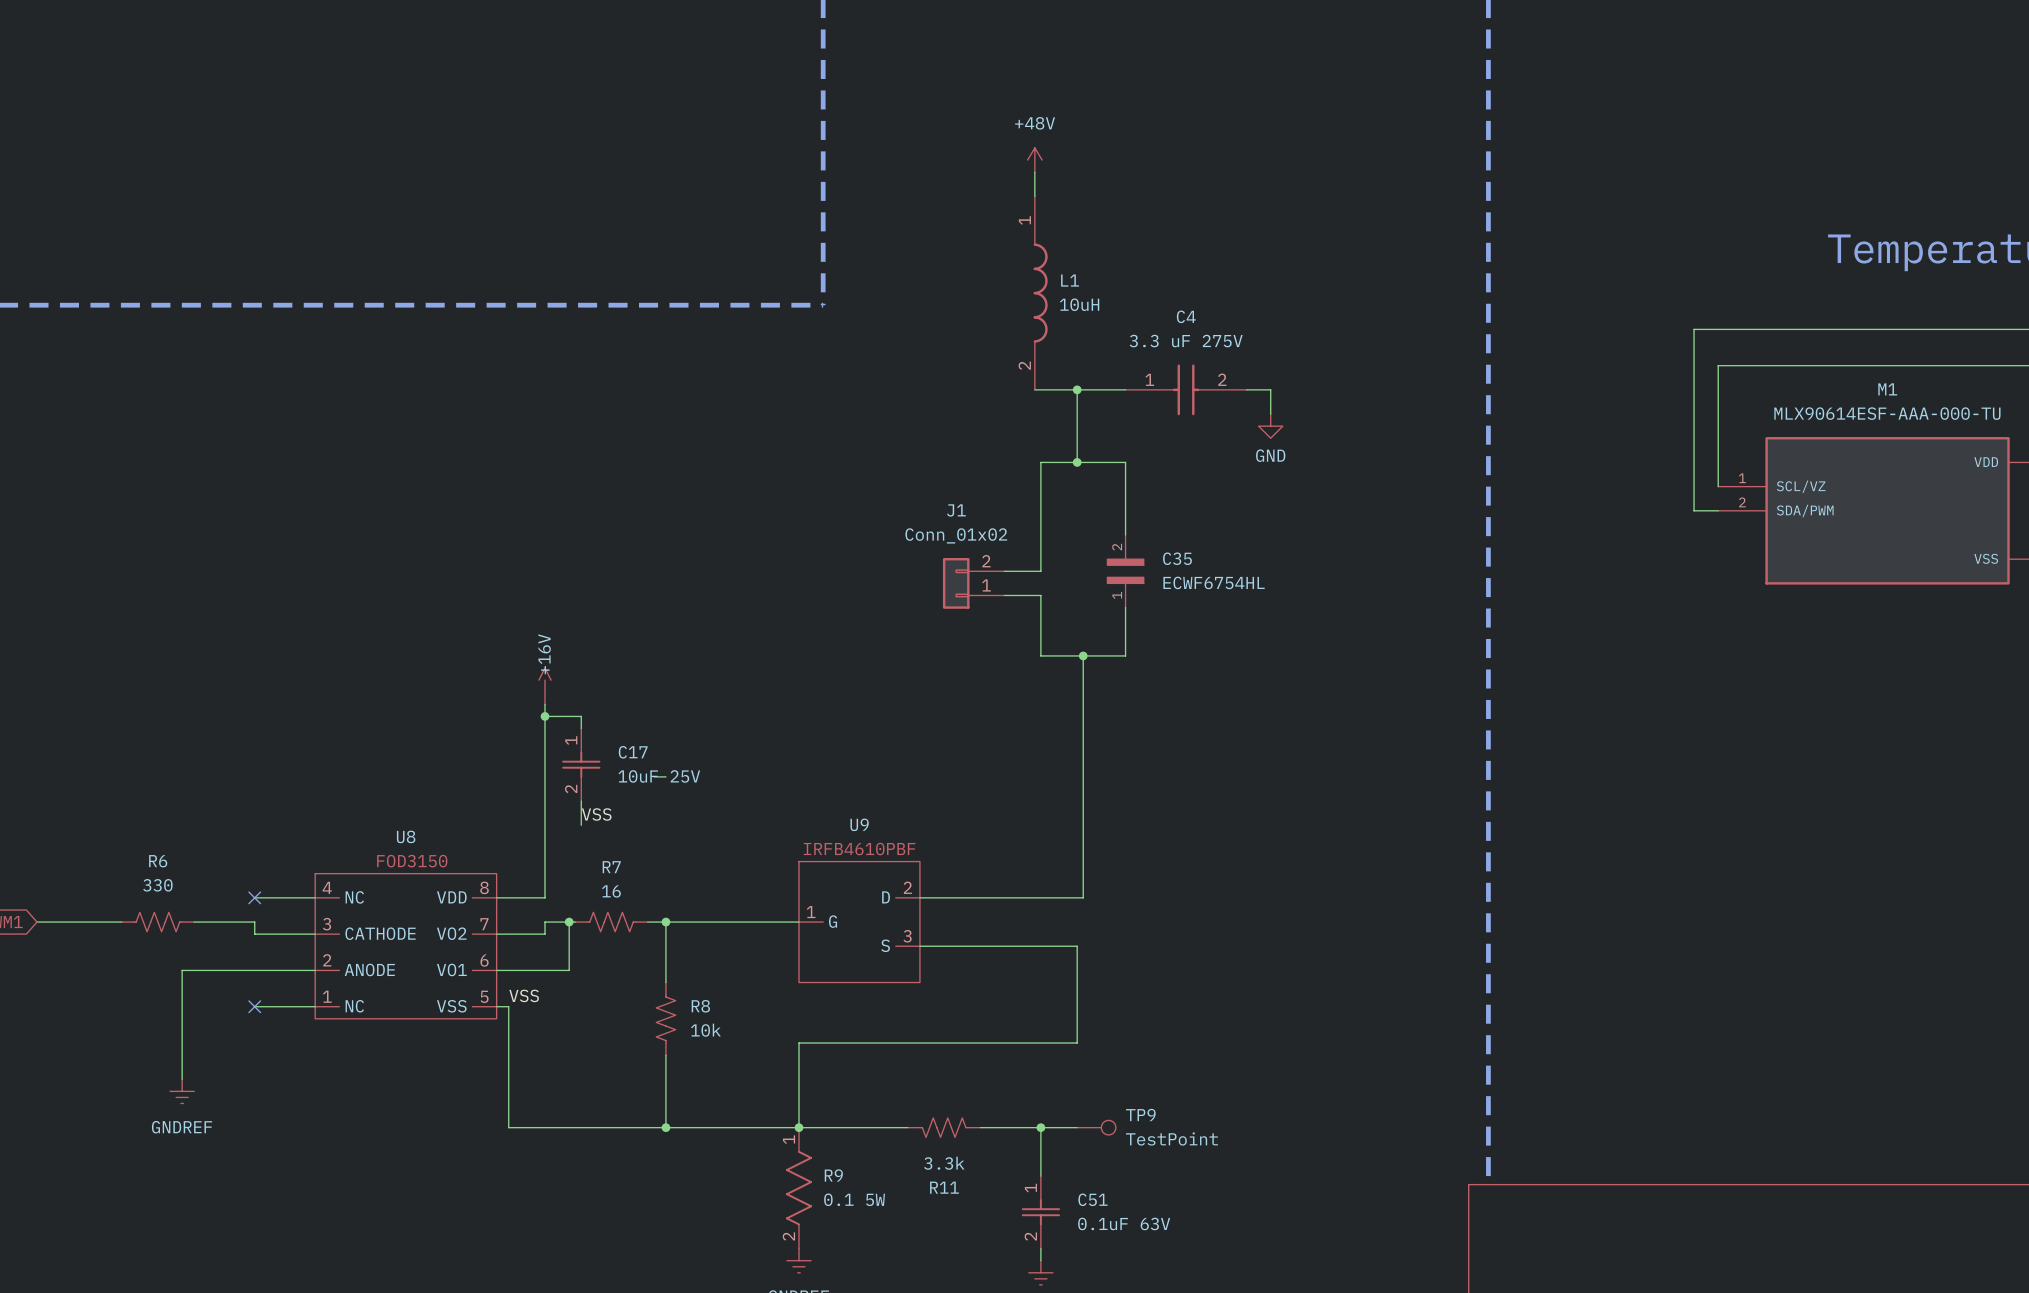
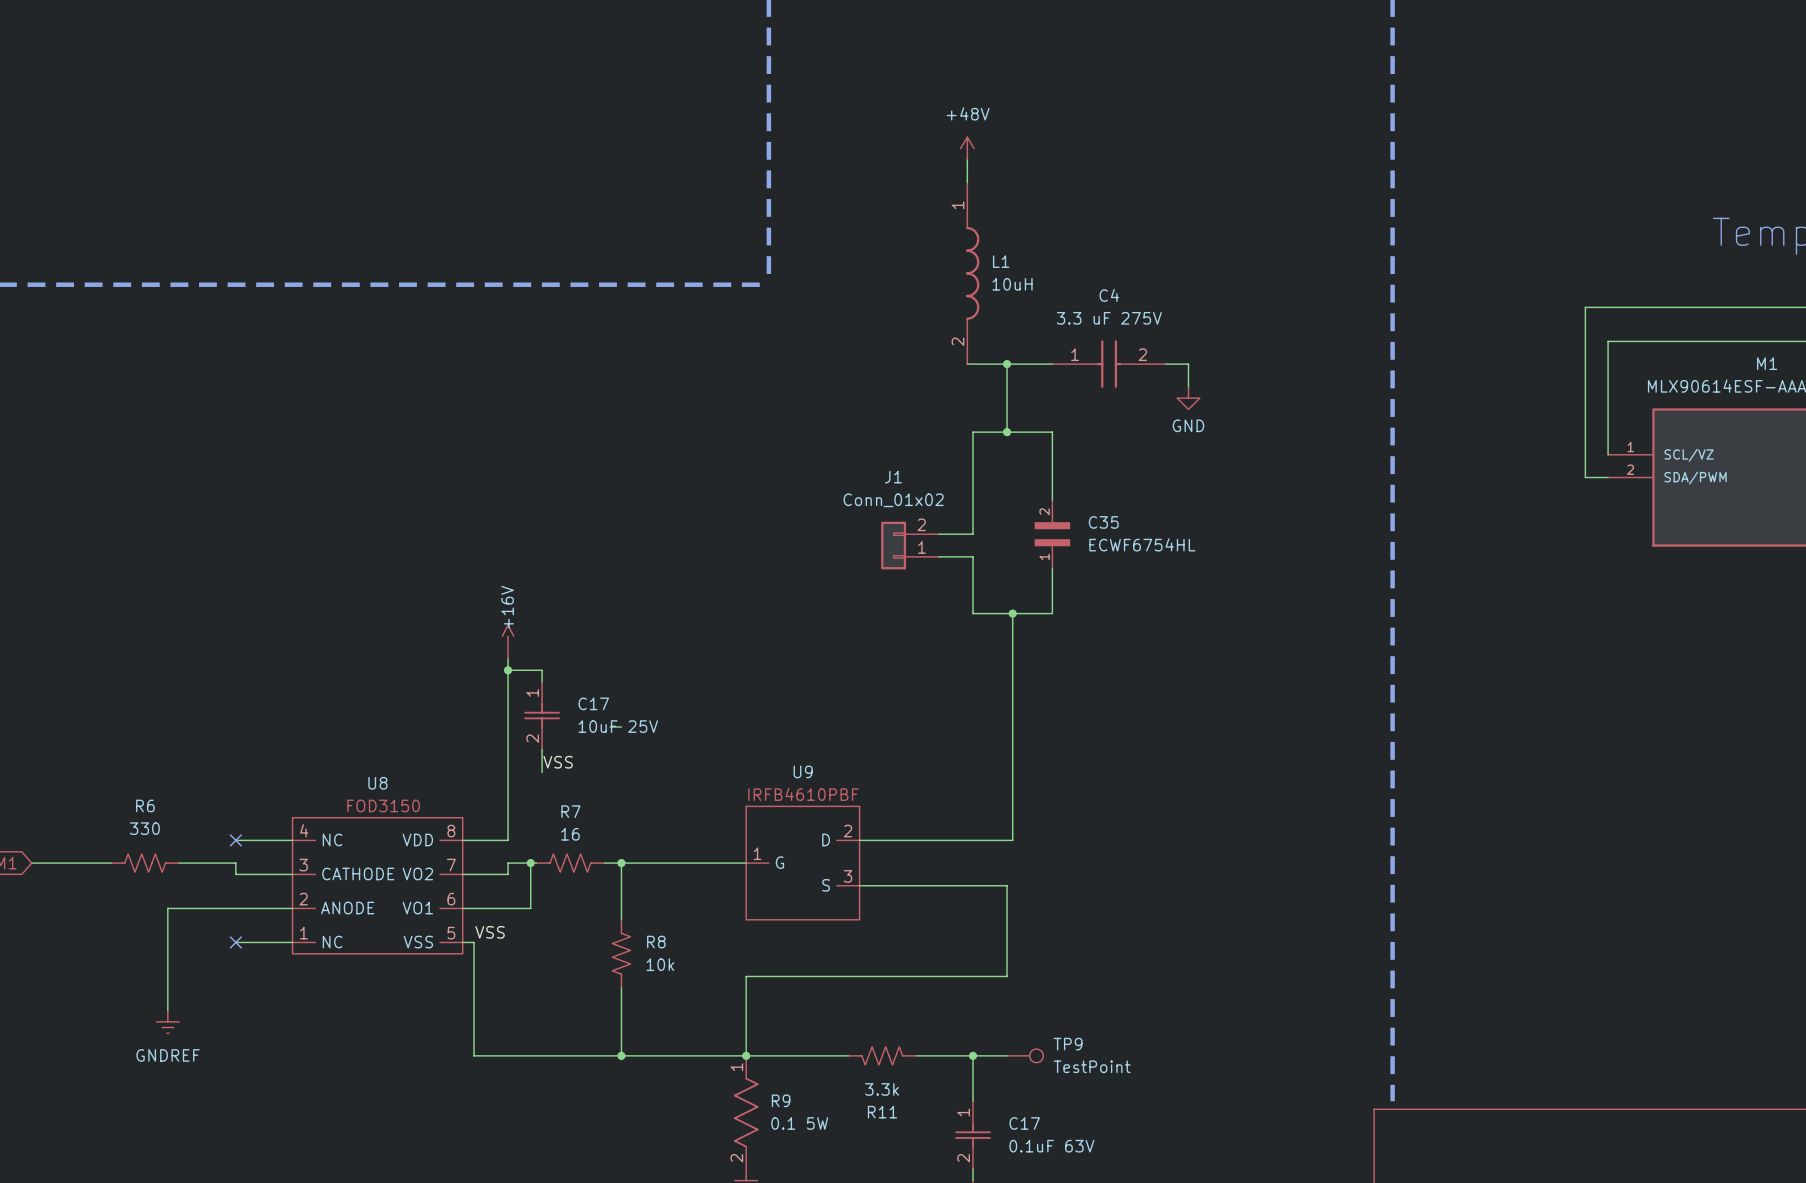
C51 name: C51 (1092, 1199) -> C17 (1024, 1123)

